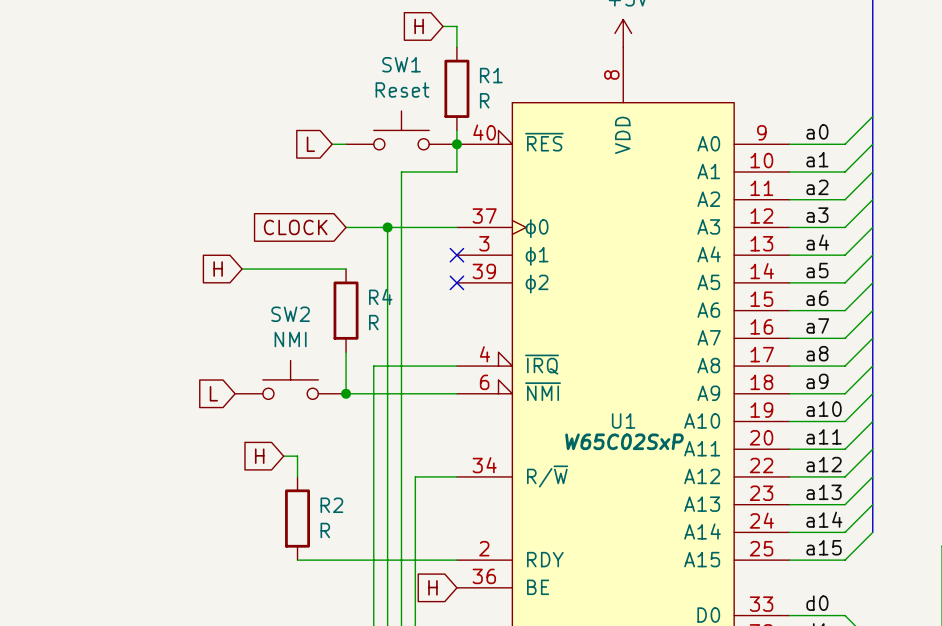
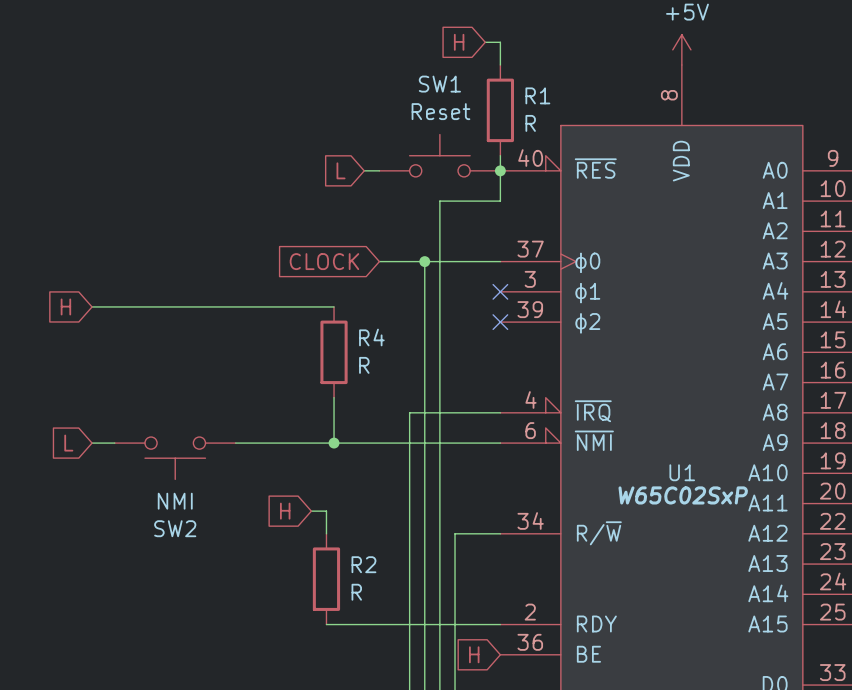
wire: none -> (92, 306) (265, 306)
global label position: H (218, 269) -> H (65, 306)
wire: (304, 269) (346, 269) -> none
R4 position: (346, 310) -> (334, 352)
wire: none -> (334, 397) (334, 443)
wire: (346, 352) (346, 393) -> (235, 443) (379, 443)
SW2 rotation: 0° (290, 379) -> 180° (175, 458)
SW2 position: (290, 379) -> (175, 458)
wire: none -> (92, 443) (114, 443)
global label position: L (213, 393) -> L (68, 443)
junction position: (346, 393) -> (334, 443)

